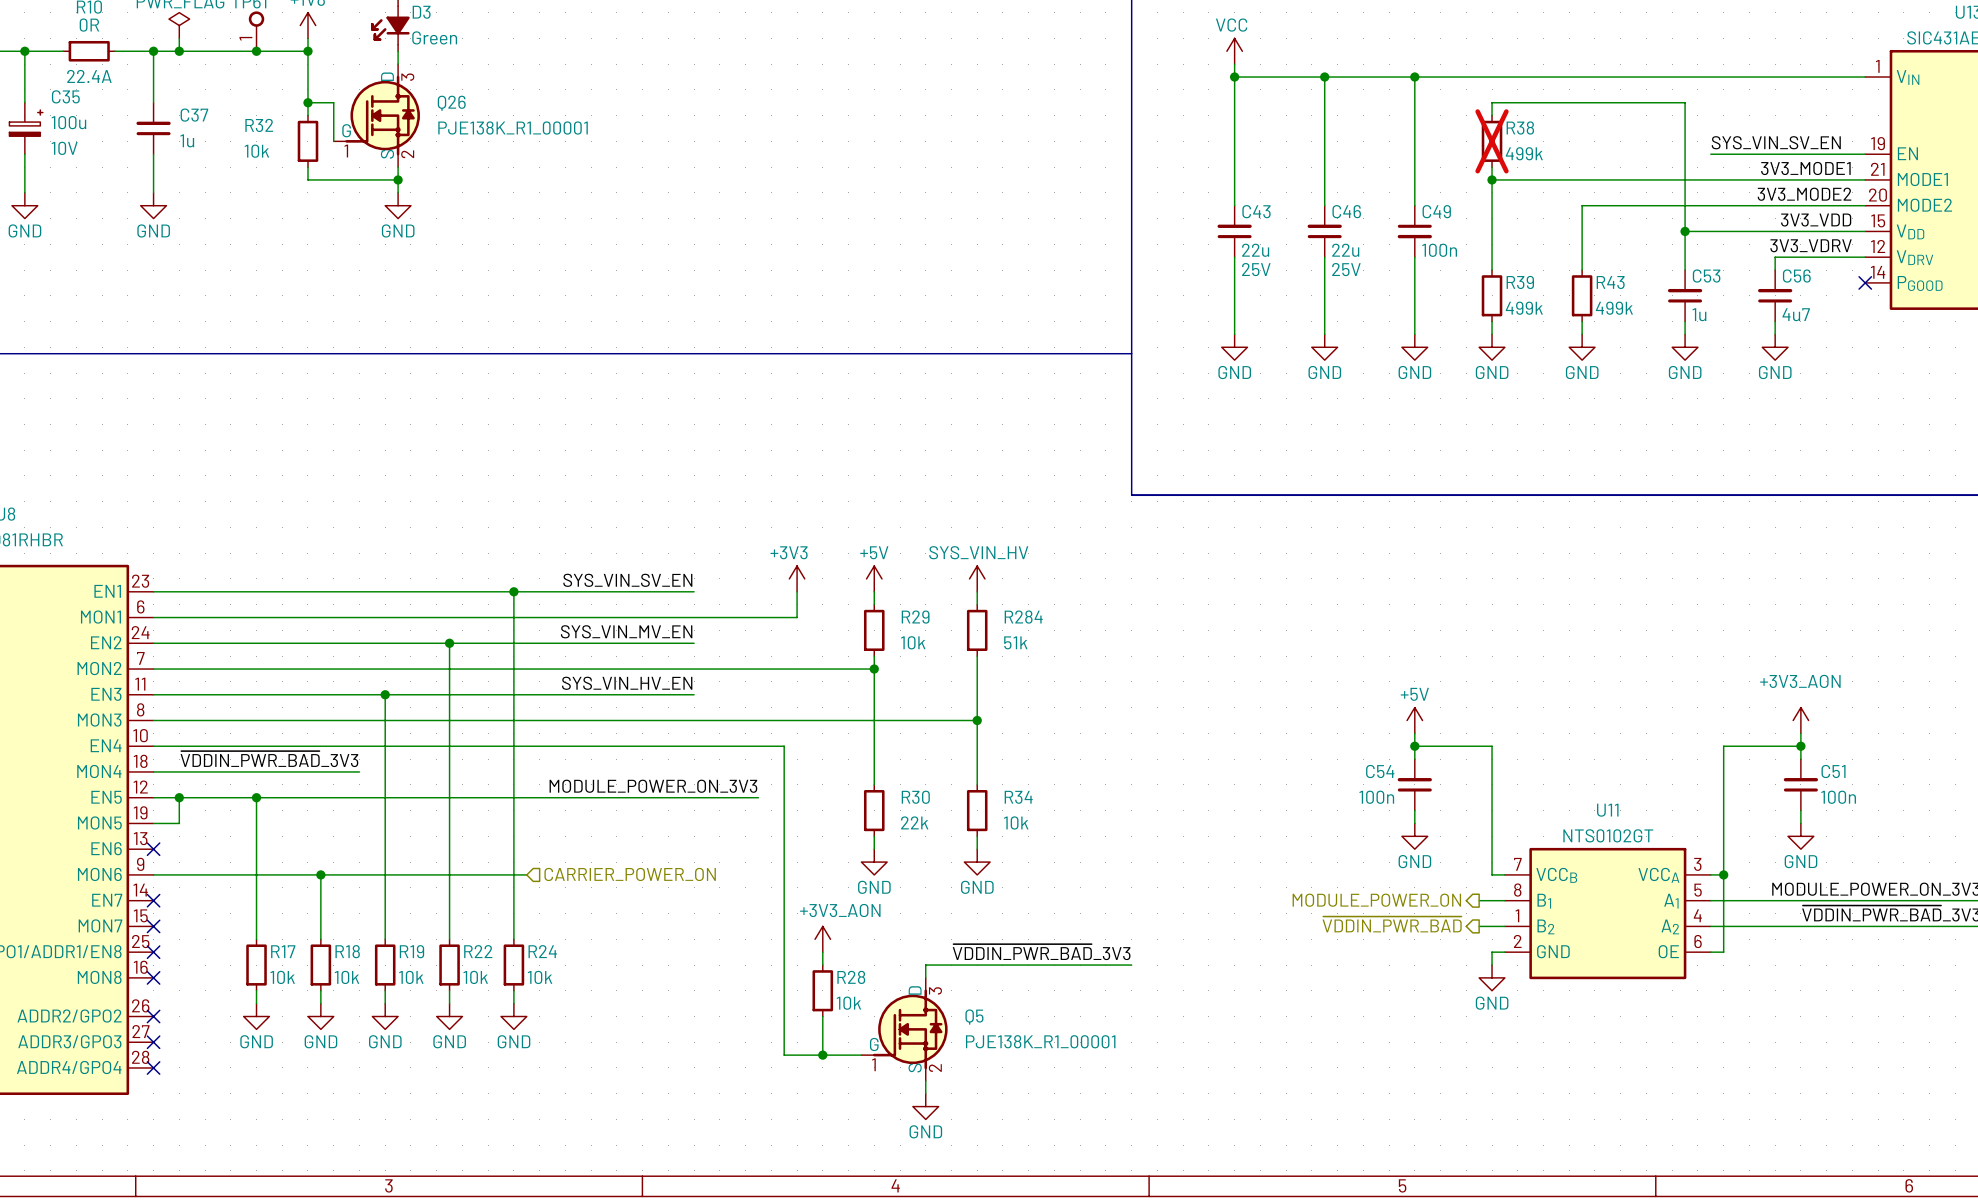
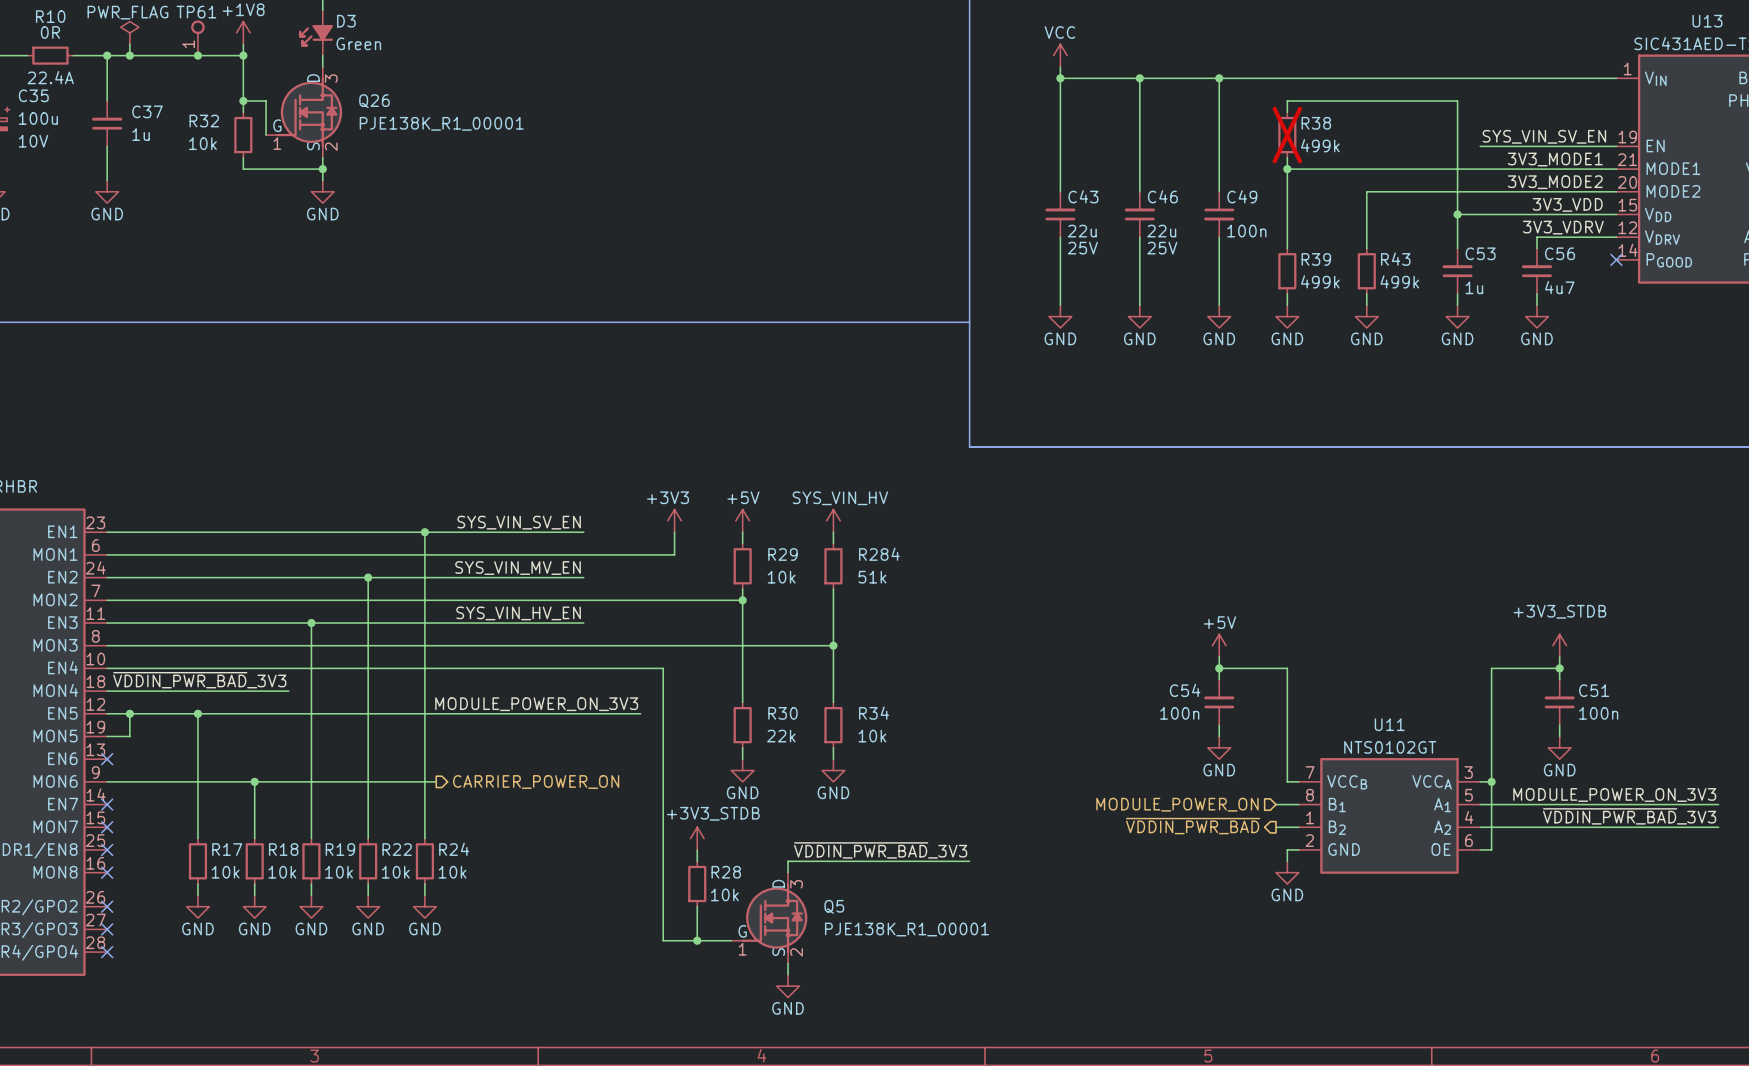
power symbol: +3V3_AON (1800, 720) -> +3V3_STDB (1559, 645)
hierarchical label shape: input (630, 874) -> output (536, 781)
hierarchical label shape: output (1376, 900) -> input (1177, 804)
power symbol: +3V3_AON (822, 939) -> +3V3_STDB (697, 838)

